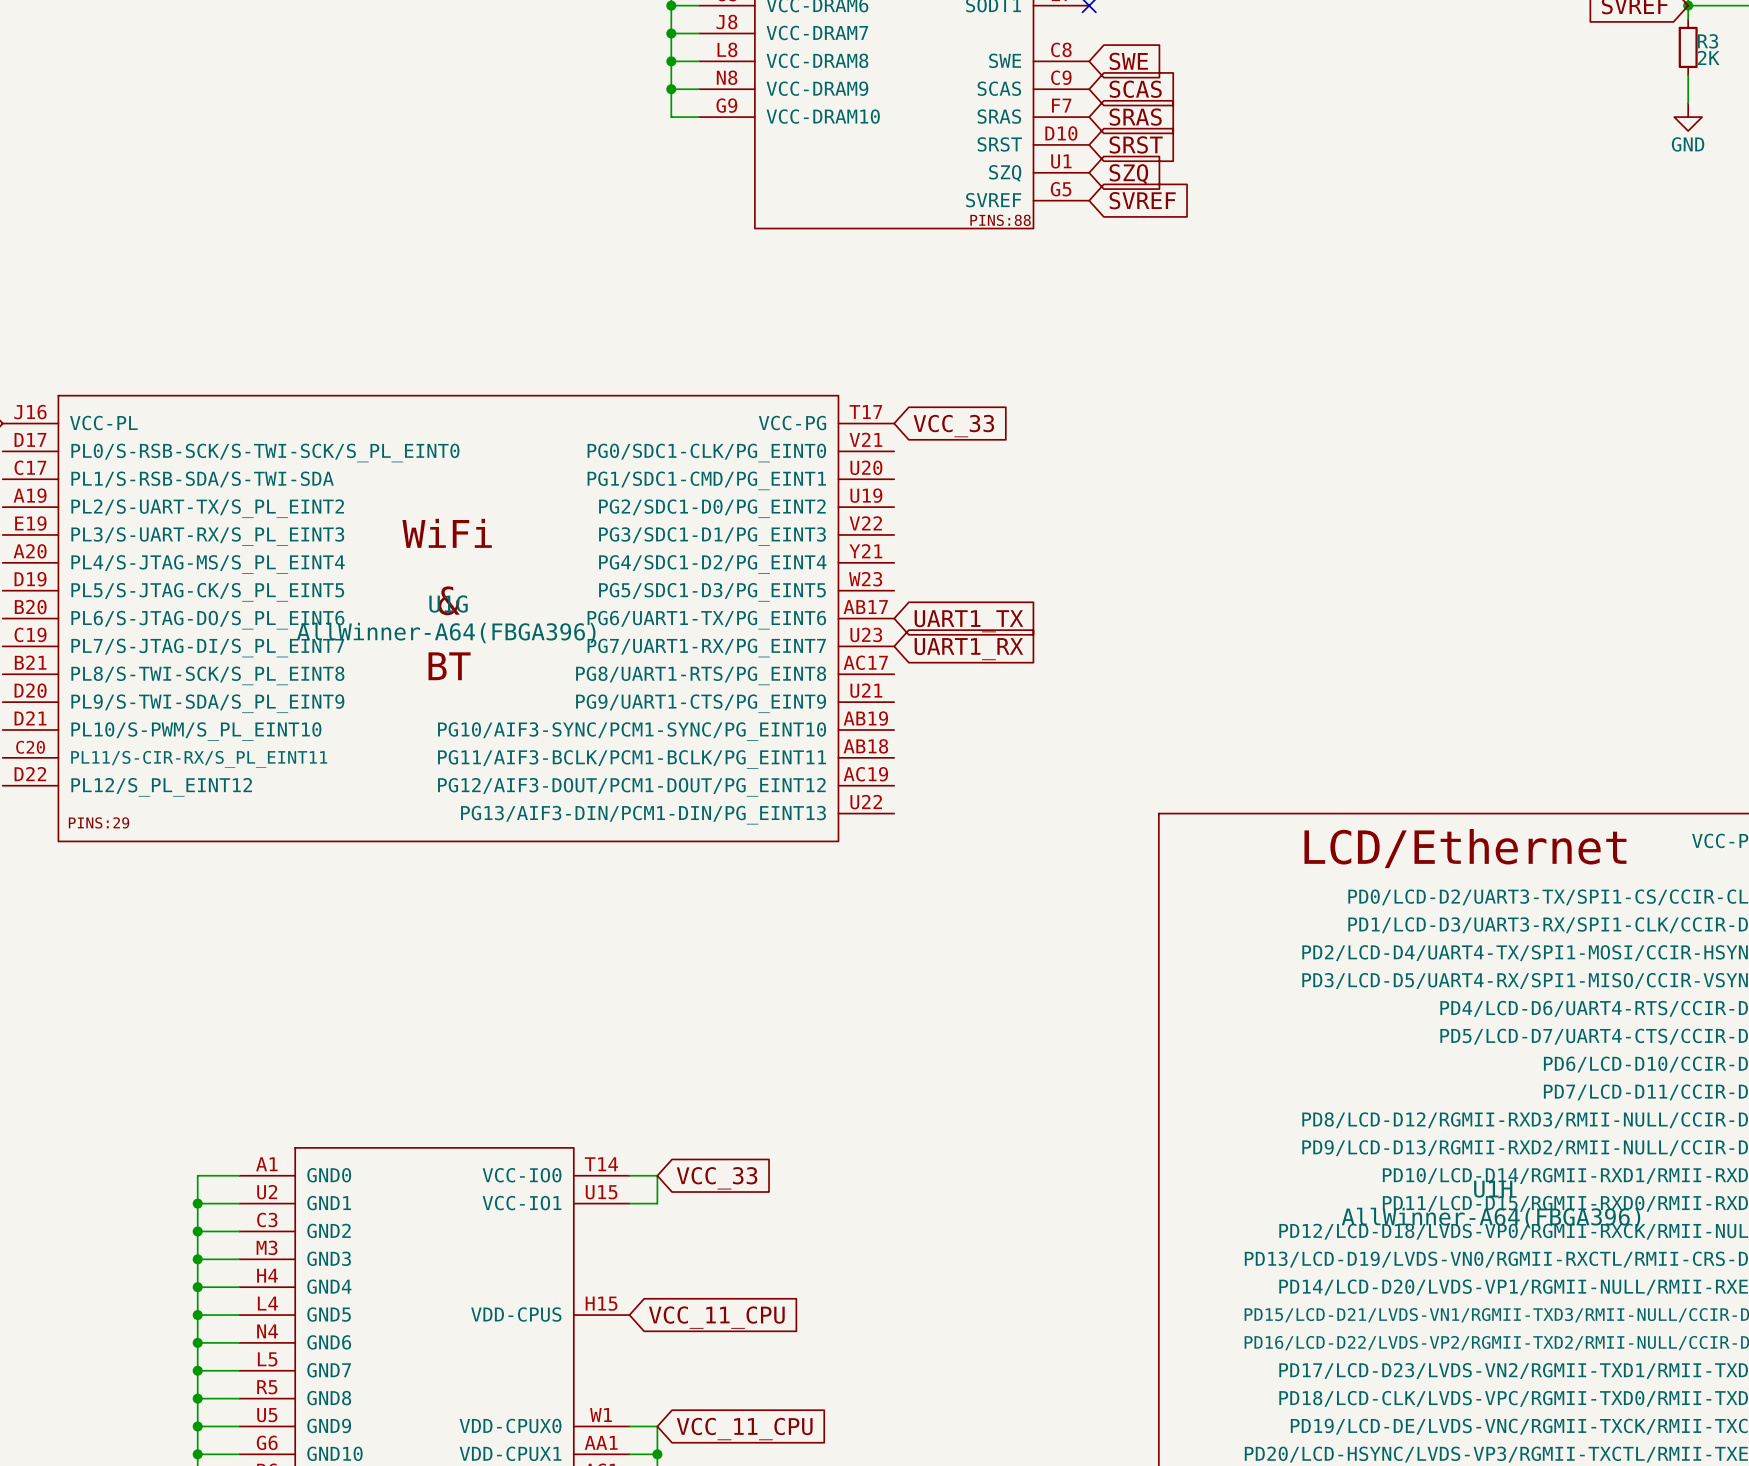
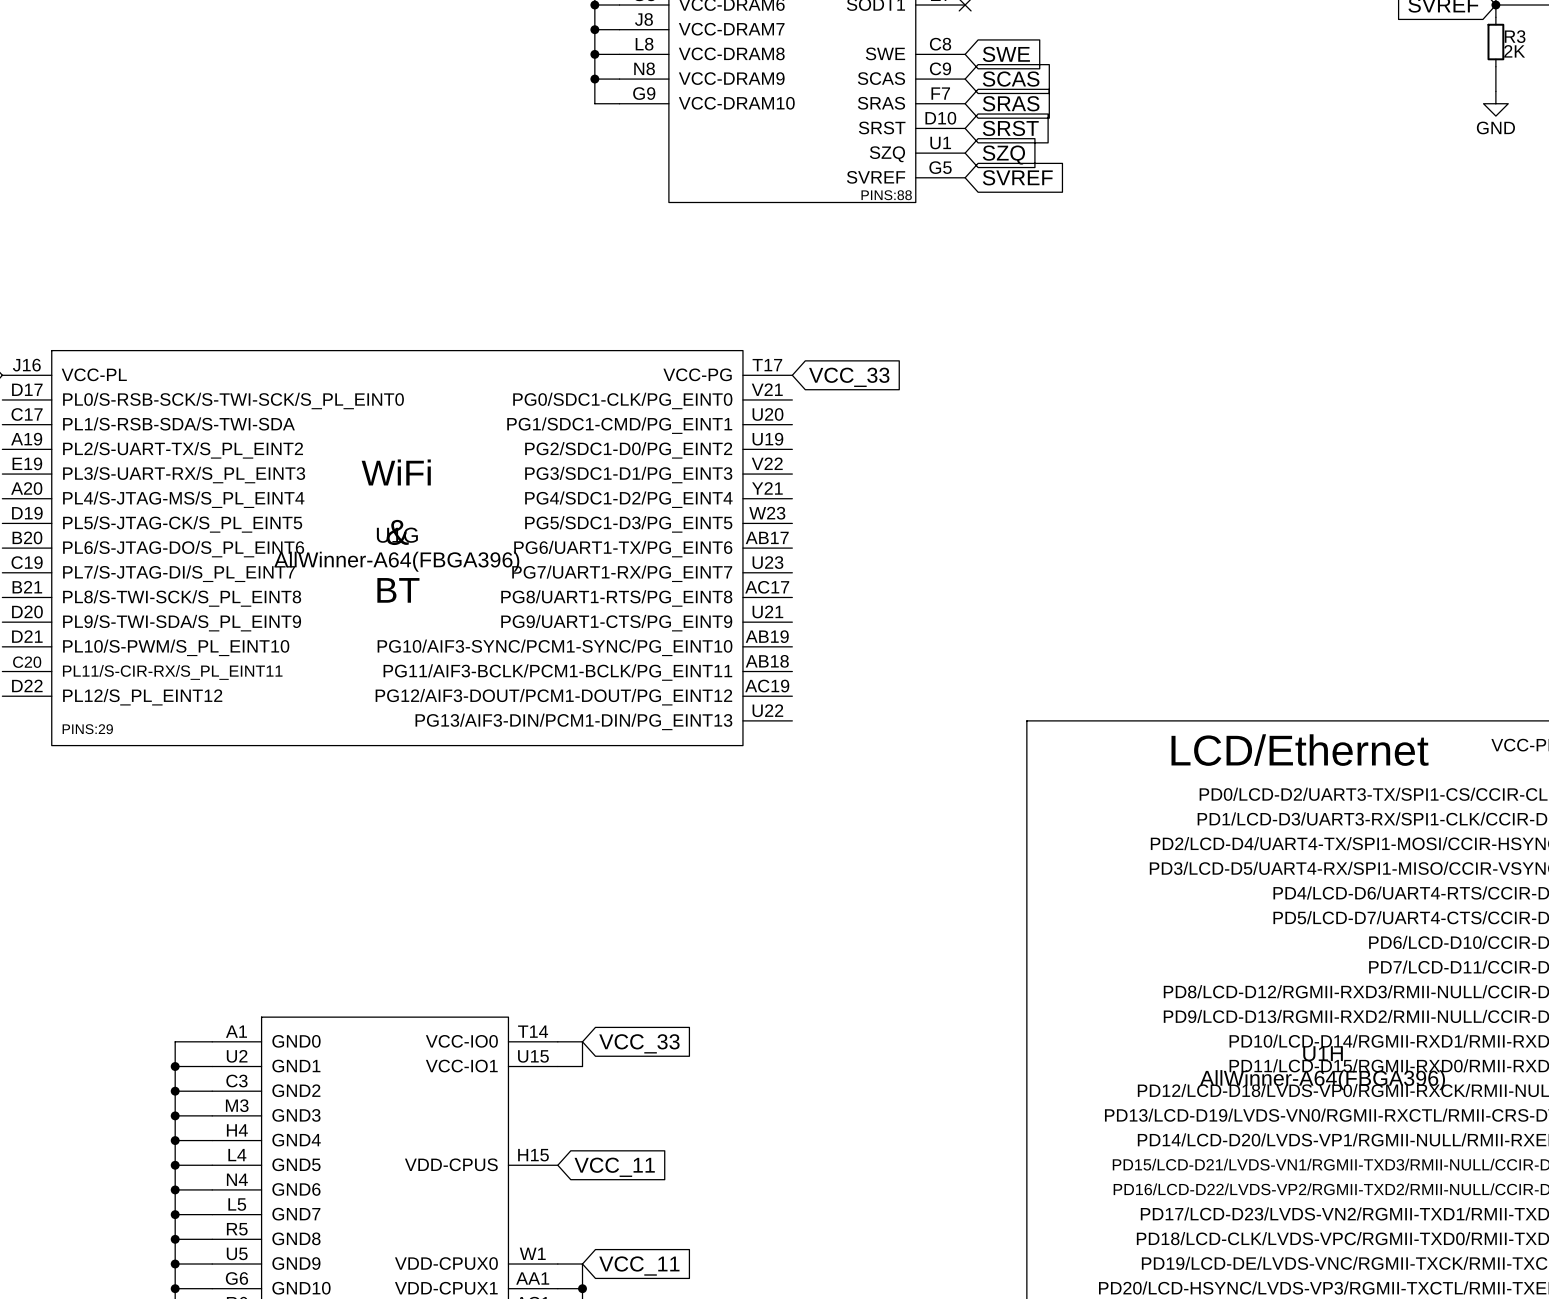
global label: UART1_TX (968, 621) -> none
global label: UART1_RX (968, 649) -> none
global label: VCC_11_CPU (716, 1317) -> VCC_11 (614, 1167)
global label: VCC_11_CPU (744, 1429) -> VCC_11 (639, 1266)

